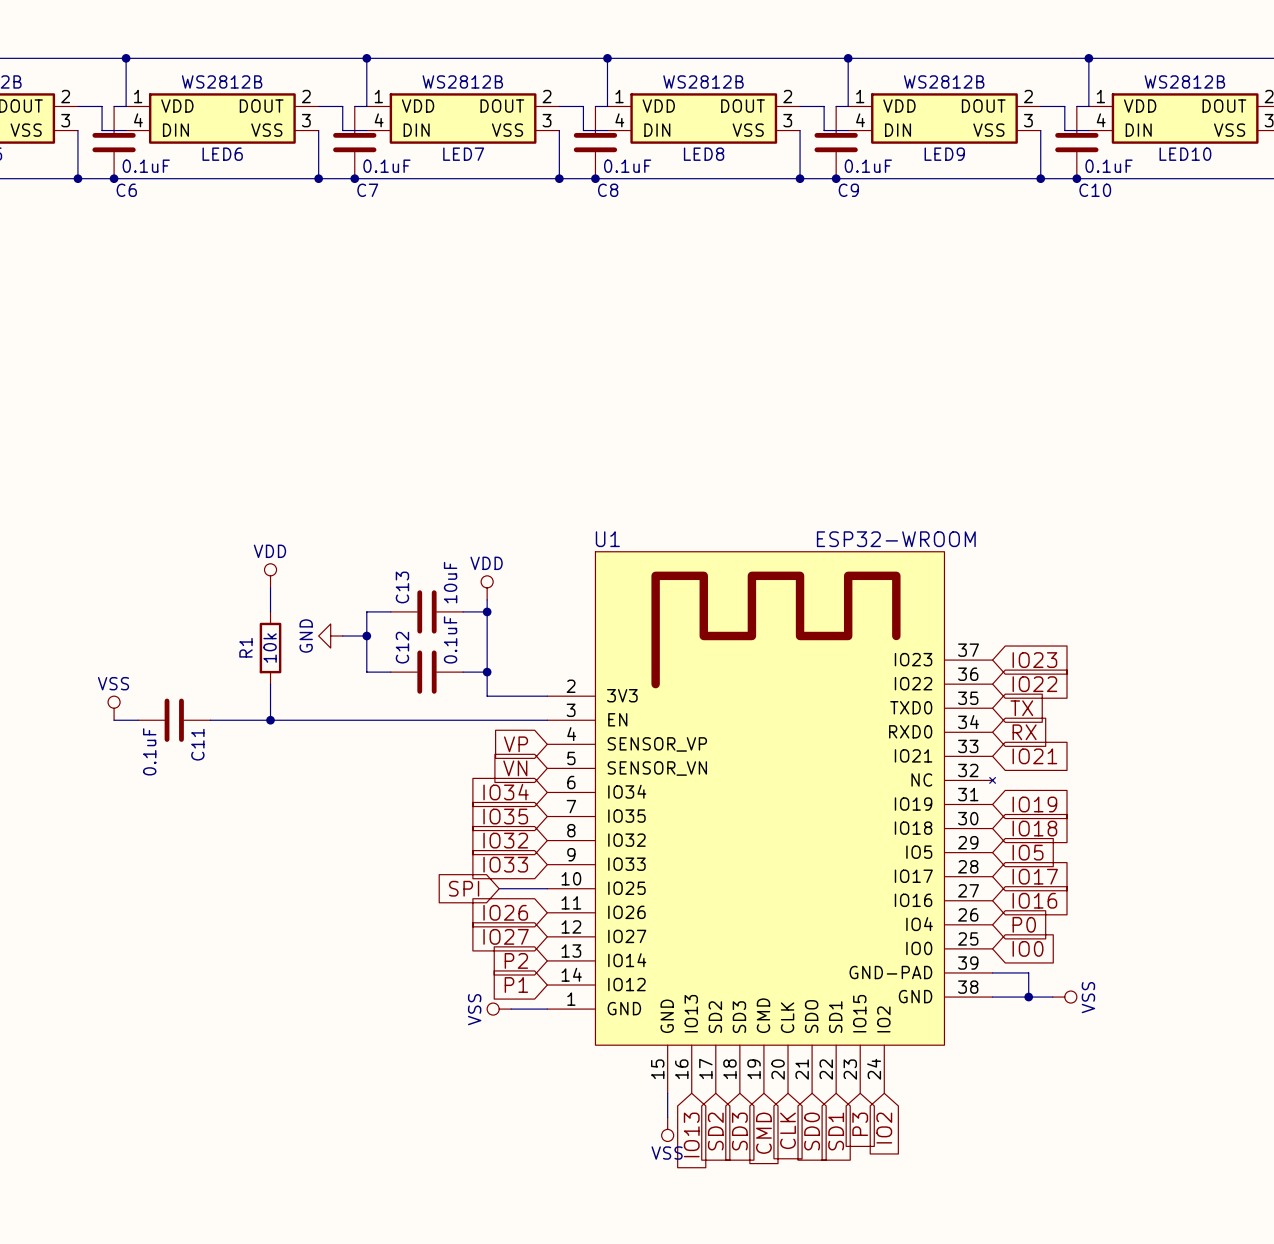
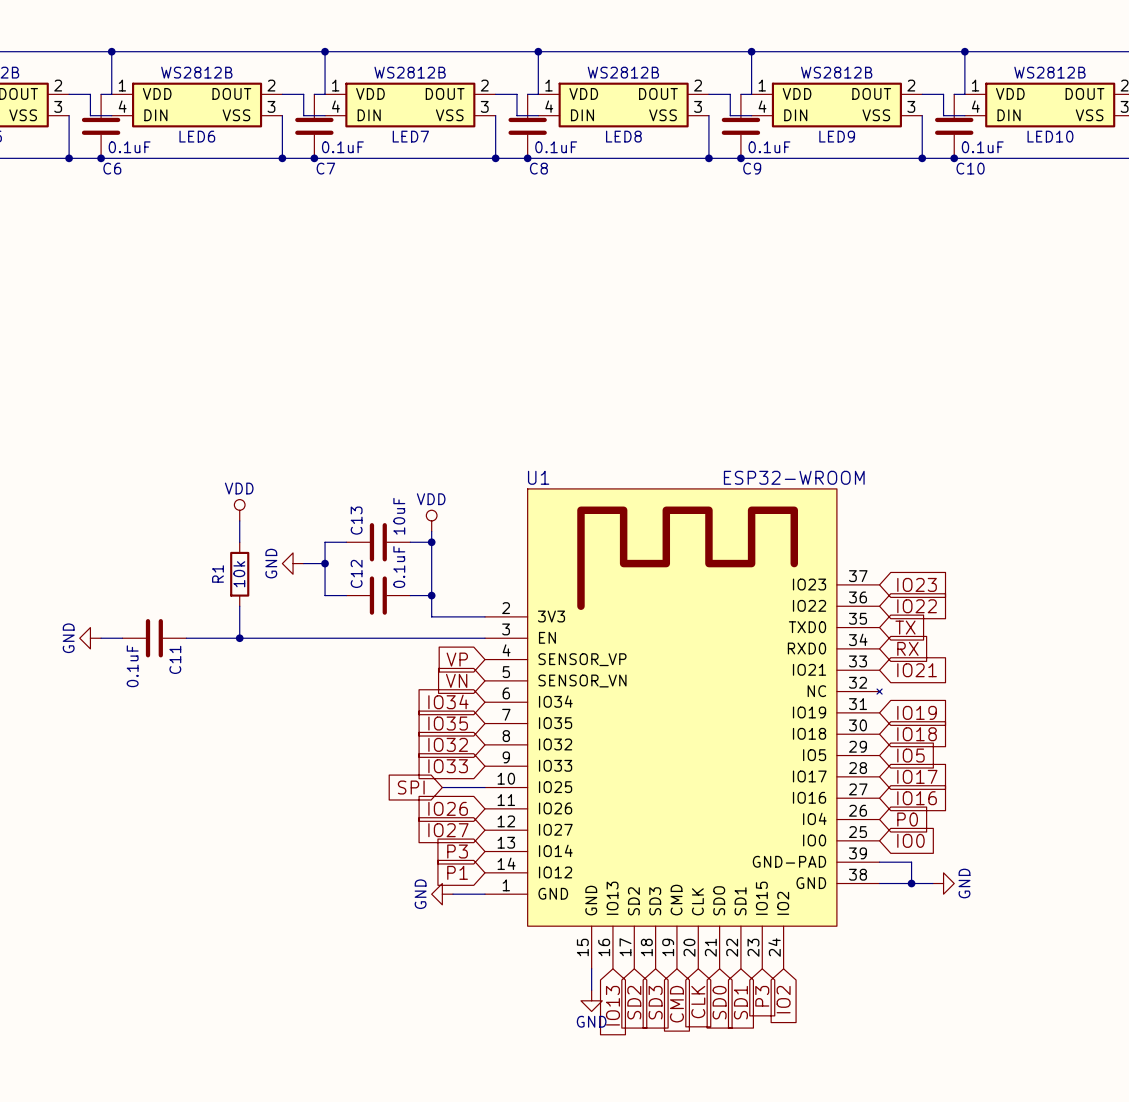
power symbol: VSS (114, 708) -> none
power symbol: none -> GND (90, 638)
global label: P2 (516, 960) -> P3 (457, 851)
power symbol: VSS (1064, 997) -> GND (943, 883)
power symbol: VSS (499, 1009) -> GND (442, 894)
power symbol: VSS (667, 1129) -> GND (591, 1000)

